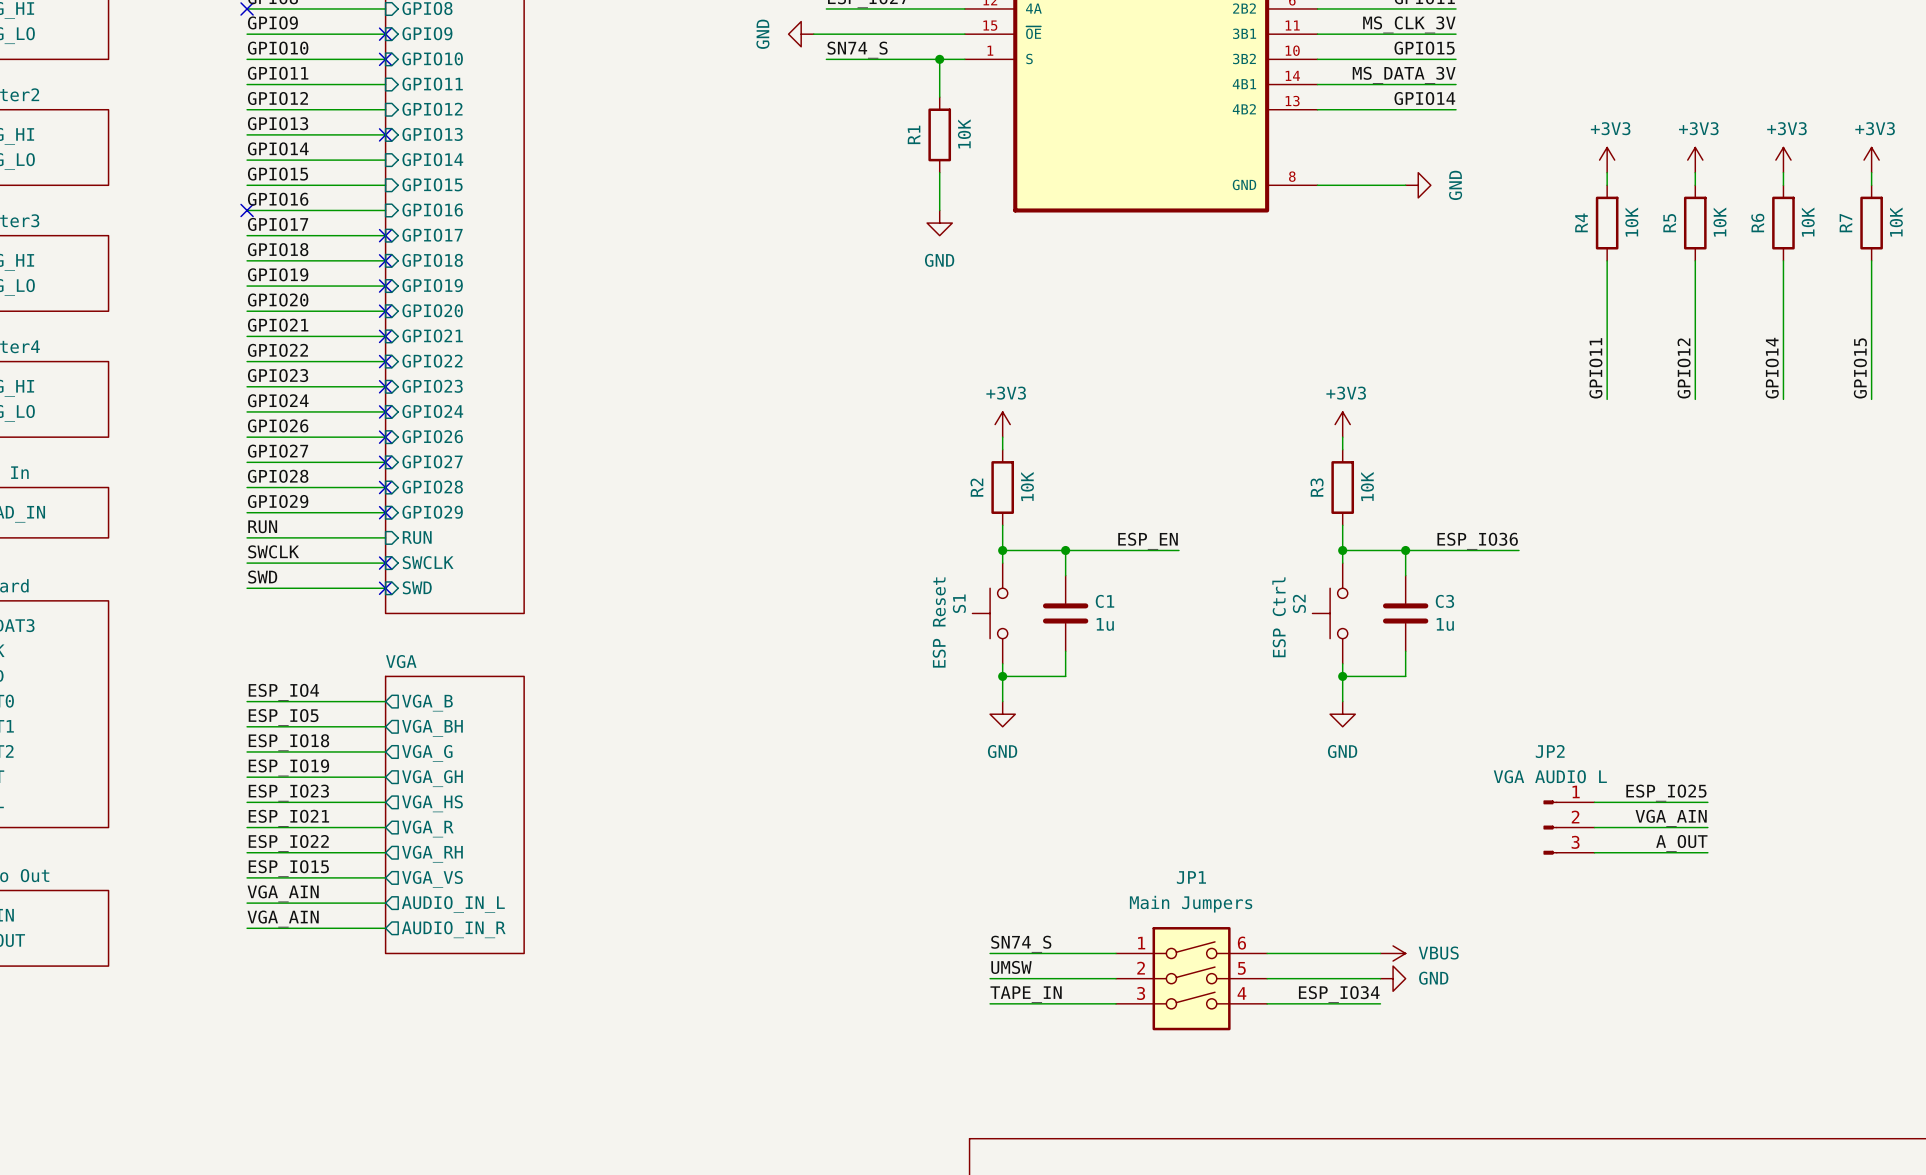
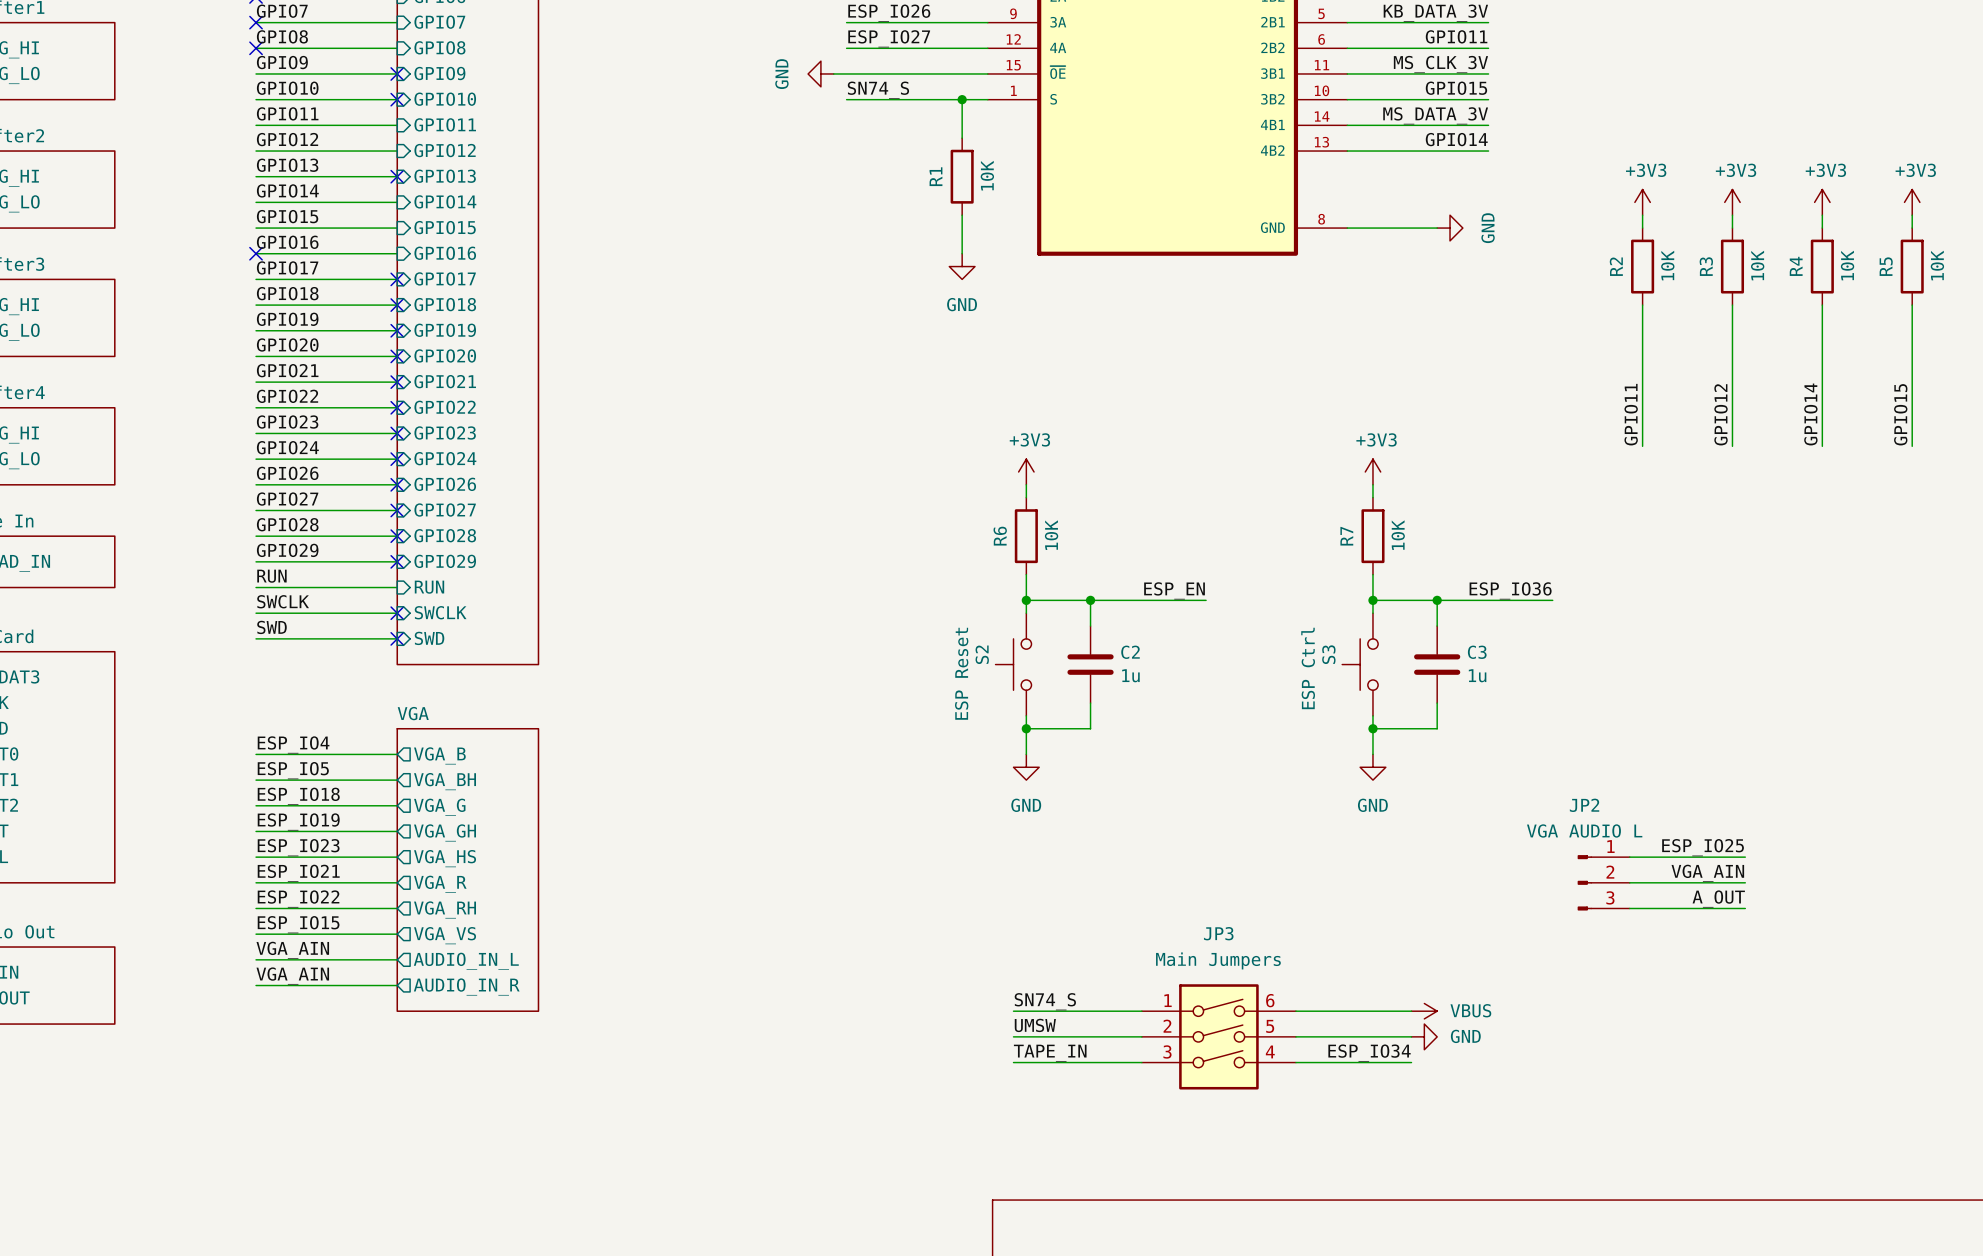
R4 name: R4 (1581, 222) -> R2 (1616, 266)
R5 name: R5 (1669, 223) -> R3 (1706, 266)
R6 name: R6 (1757, 223) -> R4 (1796, 266)
R7 name: R7 (1845, 223) -> R5 (1886, 266)
R2 name: R2 (976, 487) -> R6 (1000, 536)
R3 name: R3 (1317, 487) -> R7 (1346, 536)
C1 name: C1 (1105, 601) -> C2 (1130, 652)
S1 name: S1 (959, 603) -> S2 (982, 654)
S2 name: S2 (1299, 603) -> S3 (1328, 654)
JP1 name: JP1 (1191, 877) -> JP3 (1218, 933)

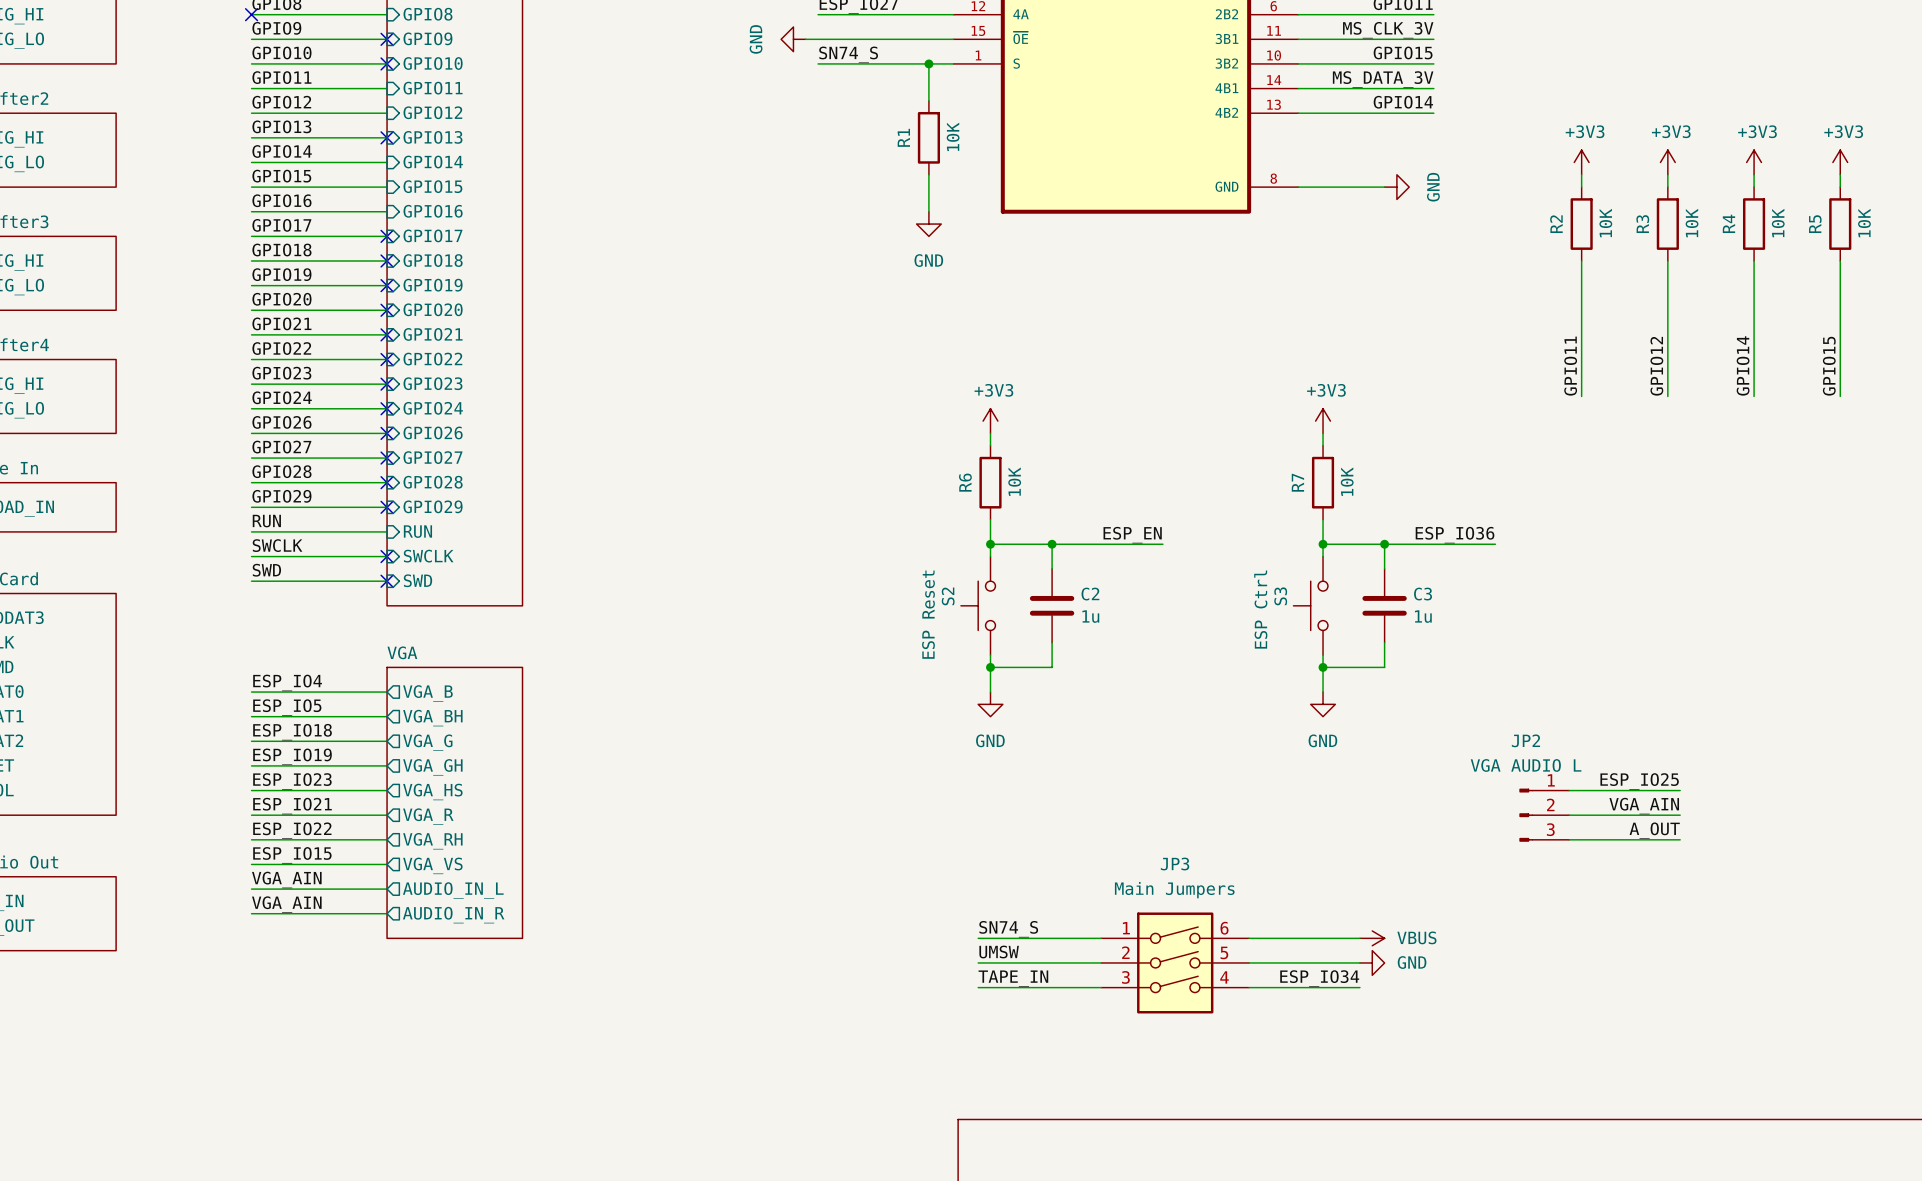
no-connect mark: (256, 253) -> none

